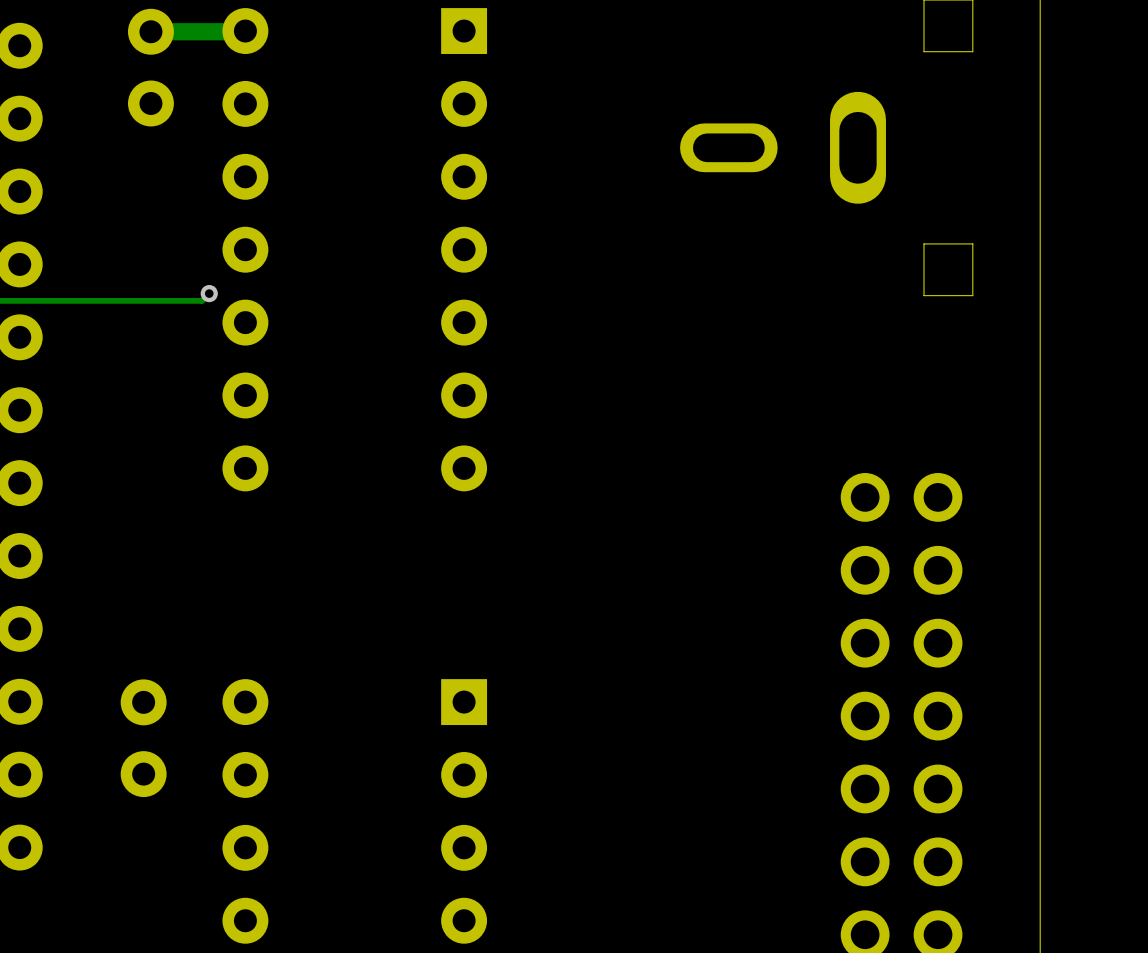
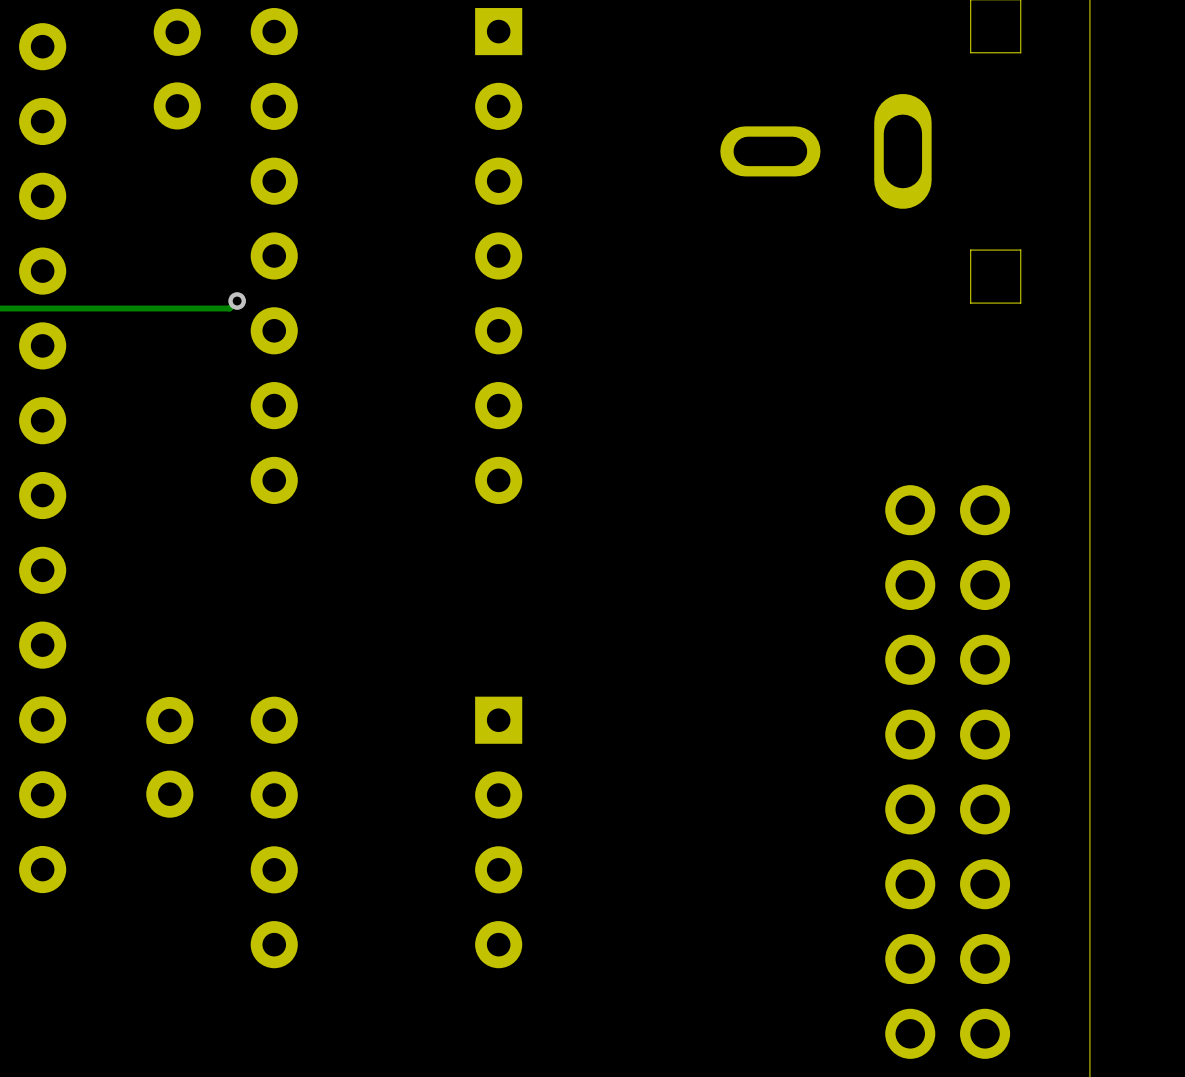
track: (245, 31) (150, 31) -> none

